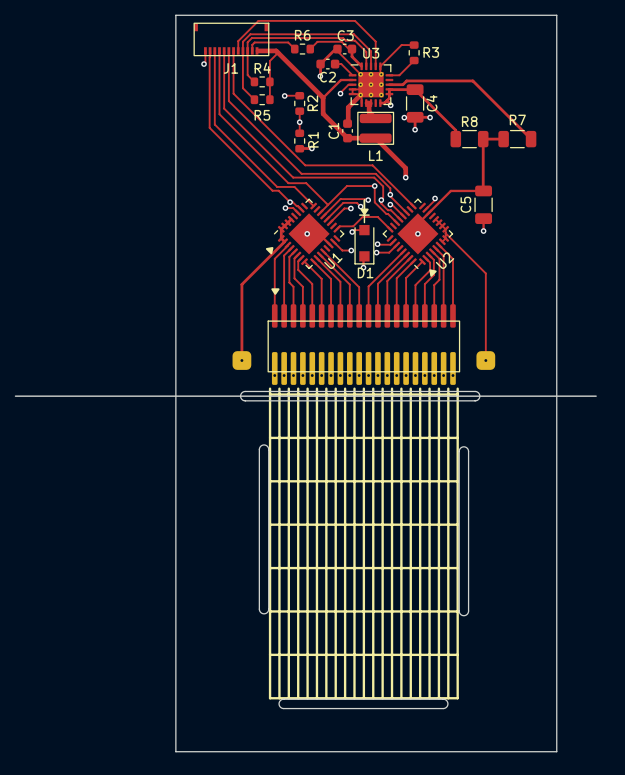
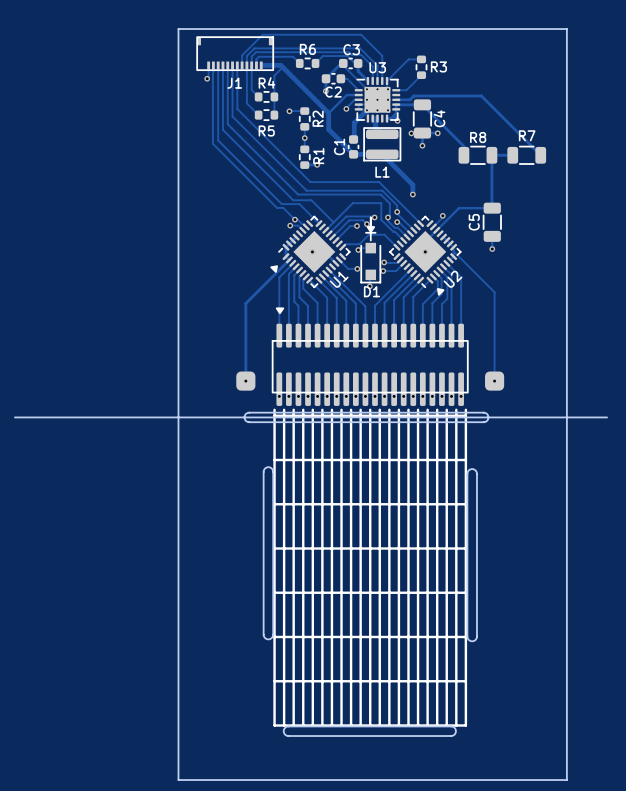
via: (374, 186) -> none

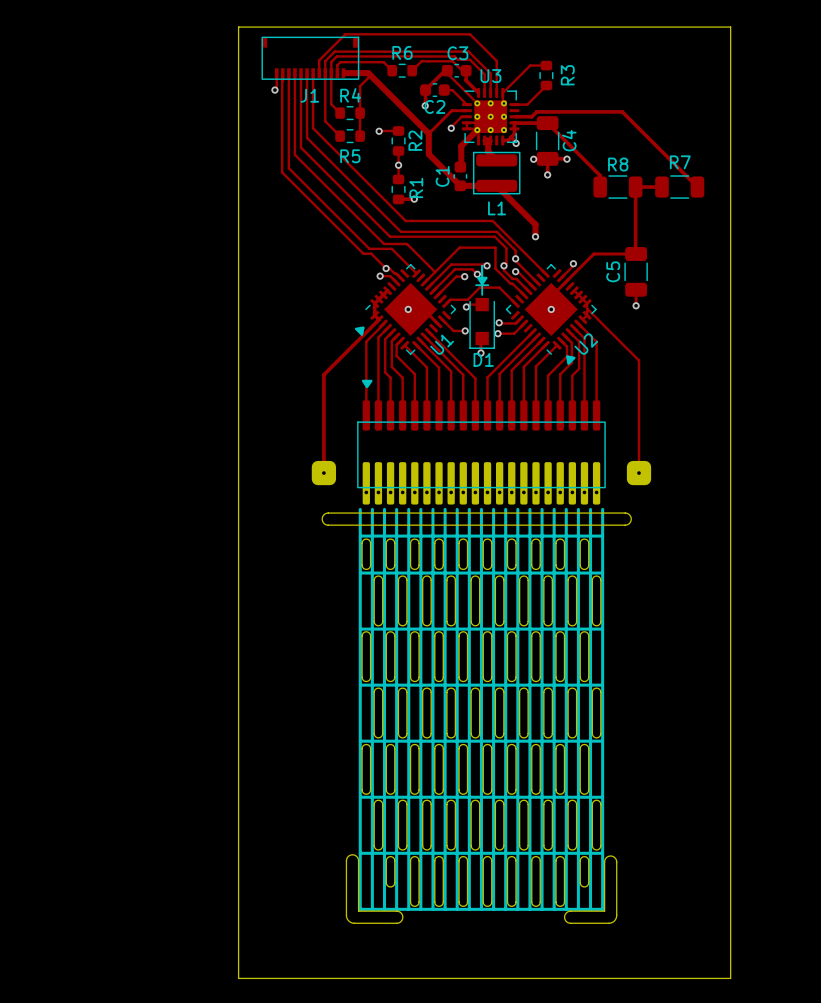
R3 name rotation: 0° (438, 66) -> 90° counterclockwise (567, 75)
part footprint: [236, 323, 505, 727] -> [311, 400, 652, 911]
board edge: (14, 417) (607, 417) -> none
board edge: (263, 471) (263, 634) (268, 639) (273, 634) (273, 471) (268, 467) (263, 471) -> none
board edge: (467, 473) (467, 636) (472, 641) (476, 636) (476, 473) (472, 469) (467, 473) -> none
board edge: none -> (346, 860) (346, 915) (348, 920) (354, 923) (396, 923) (401, 921) (402, 915) (398, 911) (358, 911) (358, 859) (351, 854) (346, 860)
board edge: none -> (604, 862) (604, 911) (569, 911) (564, 915) (567, 922) (608, 923) (615, 919) (616, 861) (610, 856) (606, 857) (604, 862)
board edge: (288, 726) (451, 726) (455, 731) (451, 736) (288, 736) (283, 731) (288, 726) -> none

